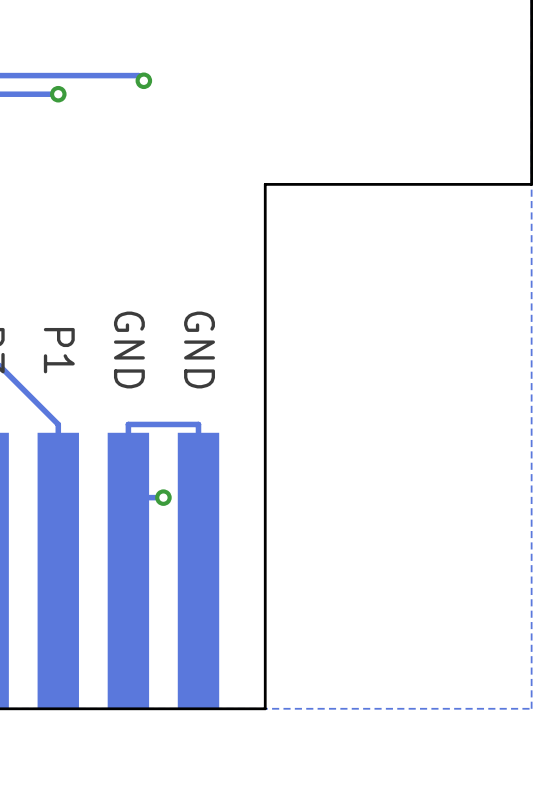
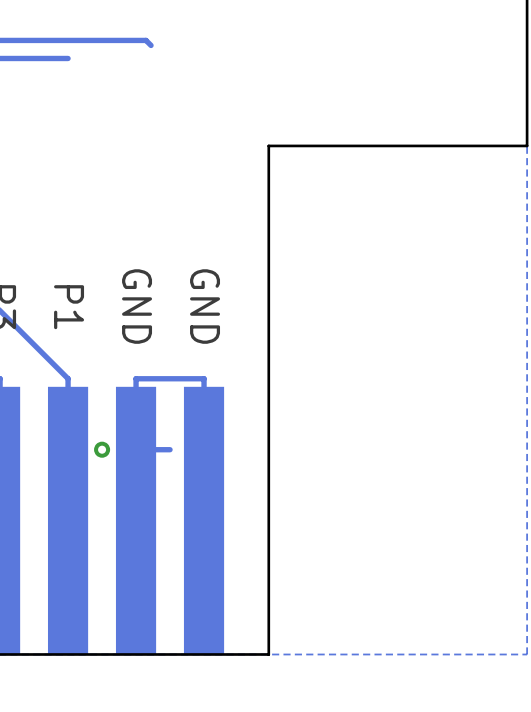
via: (143, 80) -> none
via: (58, 94) -> none
via position: (163, 497) -> (102, 449)

